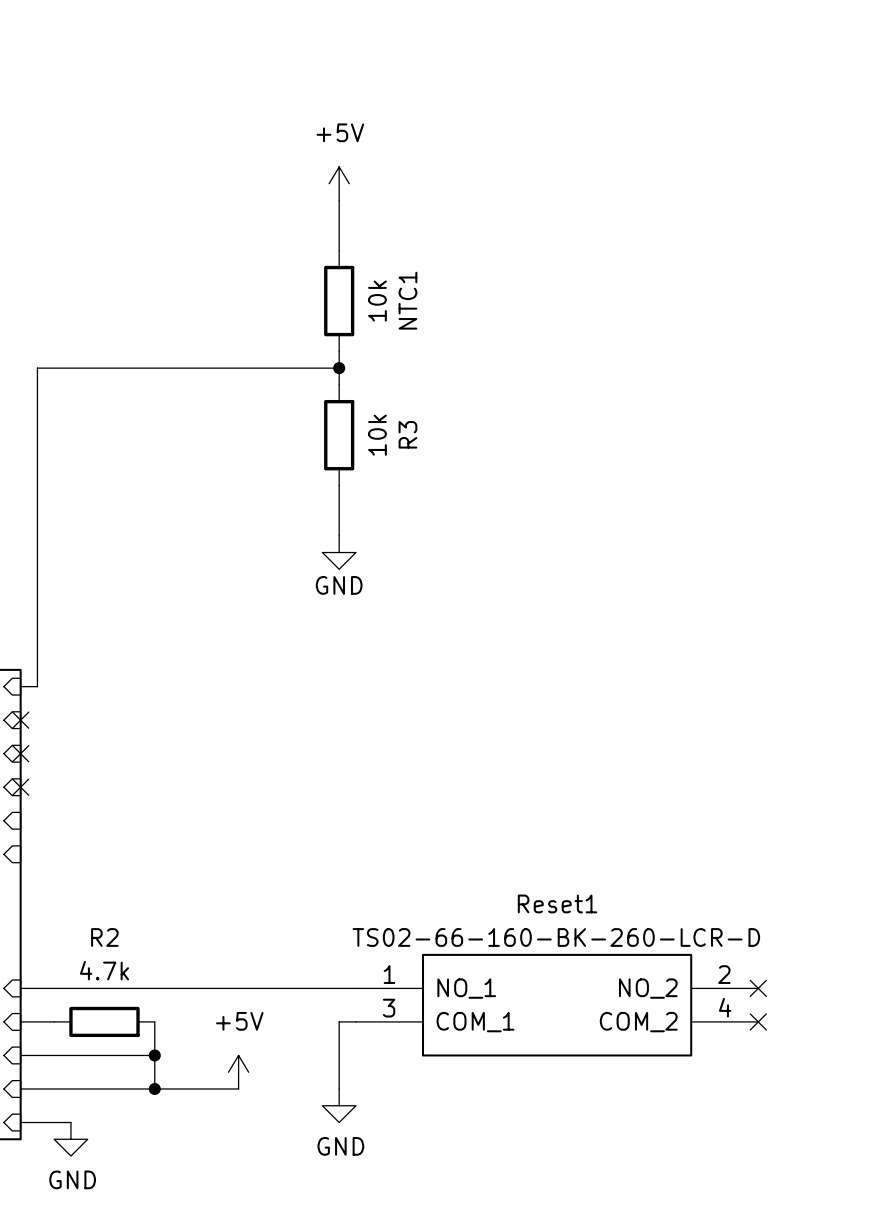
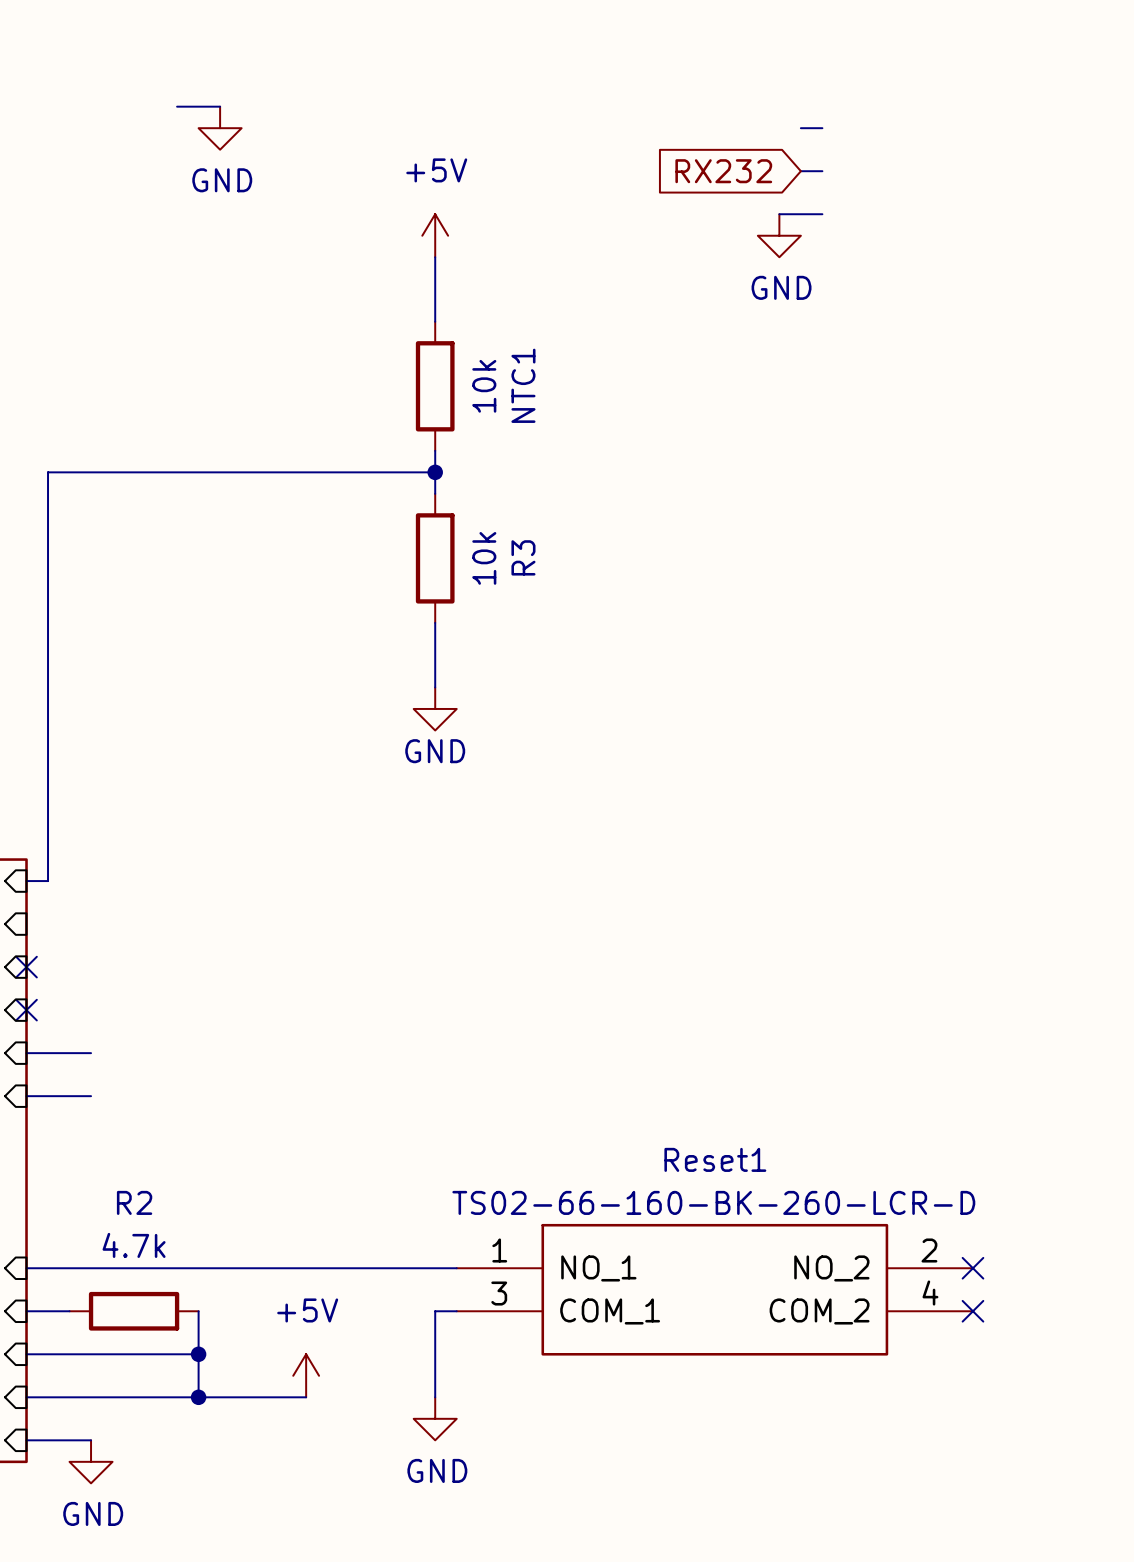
wire: none -> (177, 106) (220, 106)
power symbol: none -> GND (220, 128)
wire: none -> (800, 128) (822, 128)
global label: none -> RX232 (723, 171)
wire: none -> (800, 171) (822, 171)
wire: none -> (779, 214) (822, 214)
power symbol: none -> GND (779, 235)
no-connect mark: (20, 720) -> none
wire: none -> (26, 1053) (91, 1053)
wire: none -> (26, 1096) (91, 1096)

